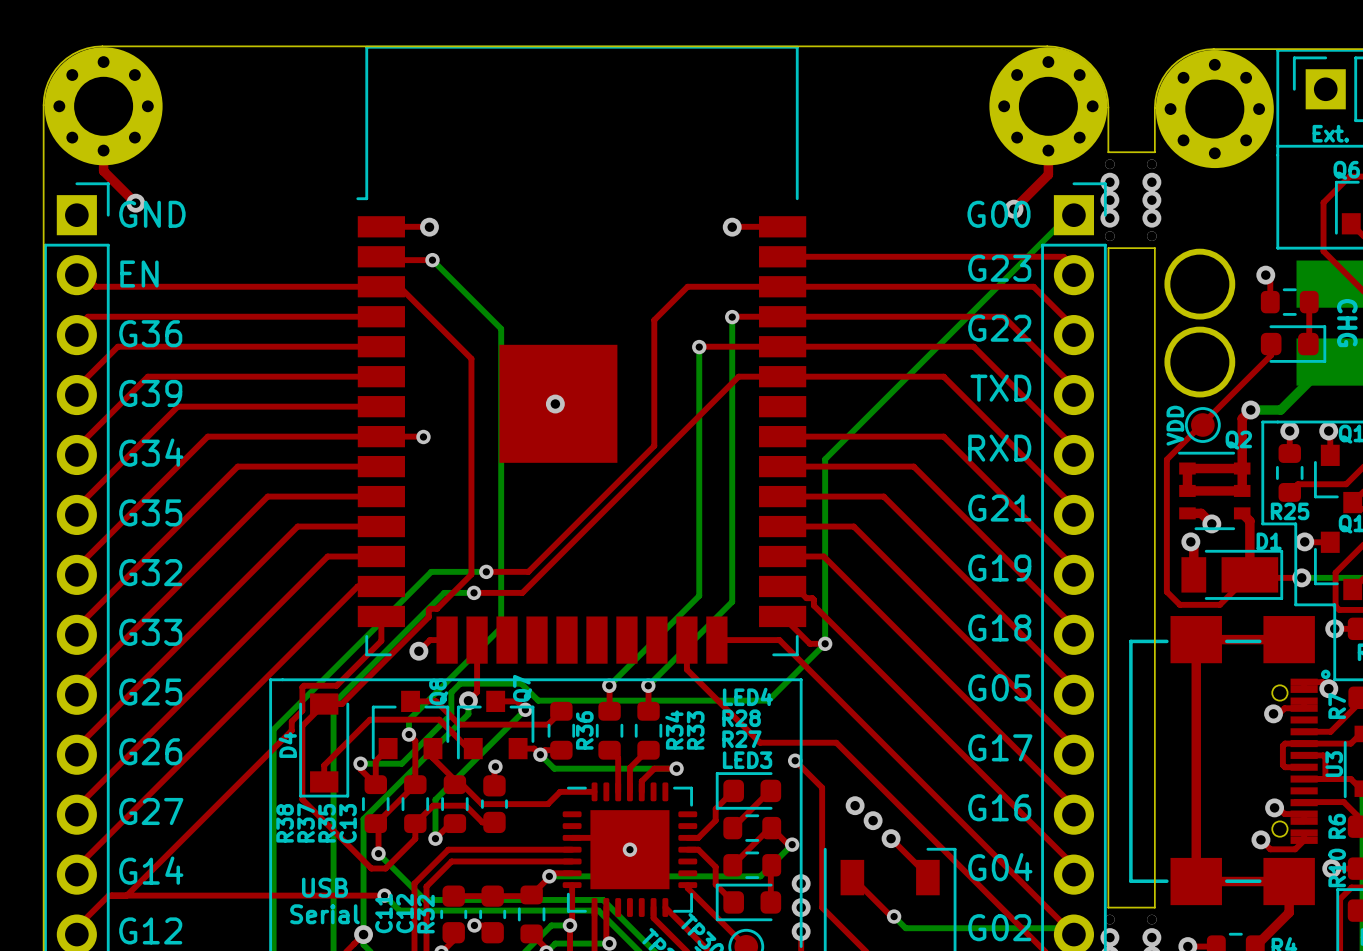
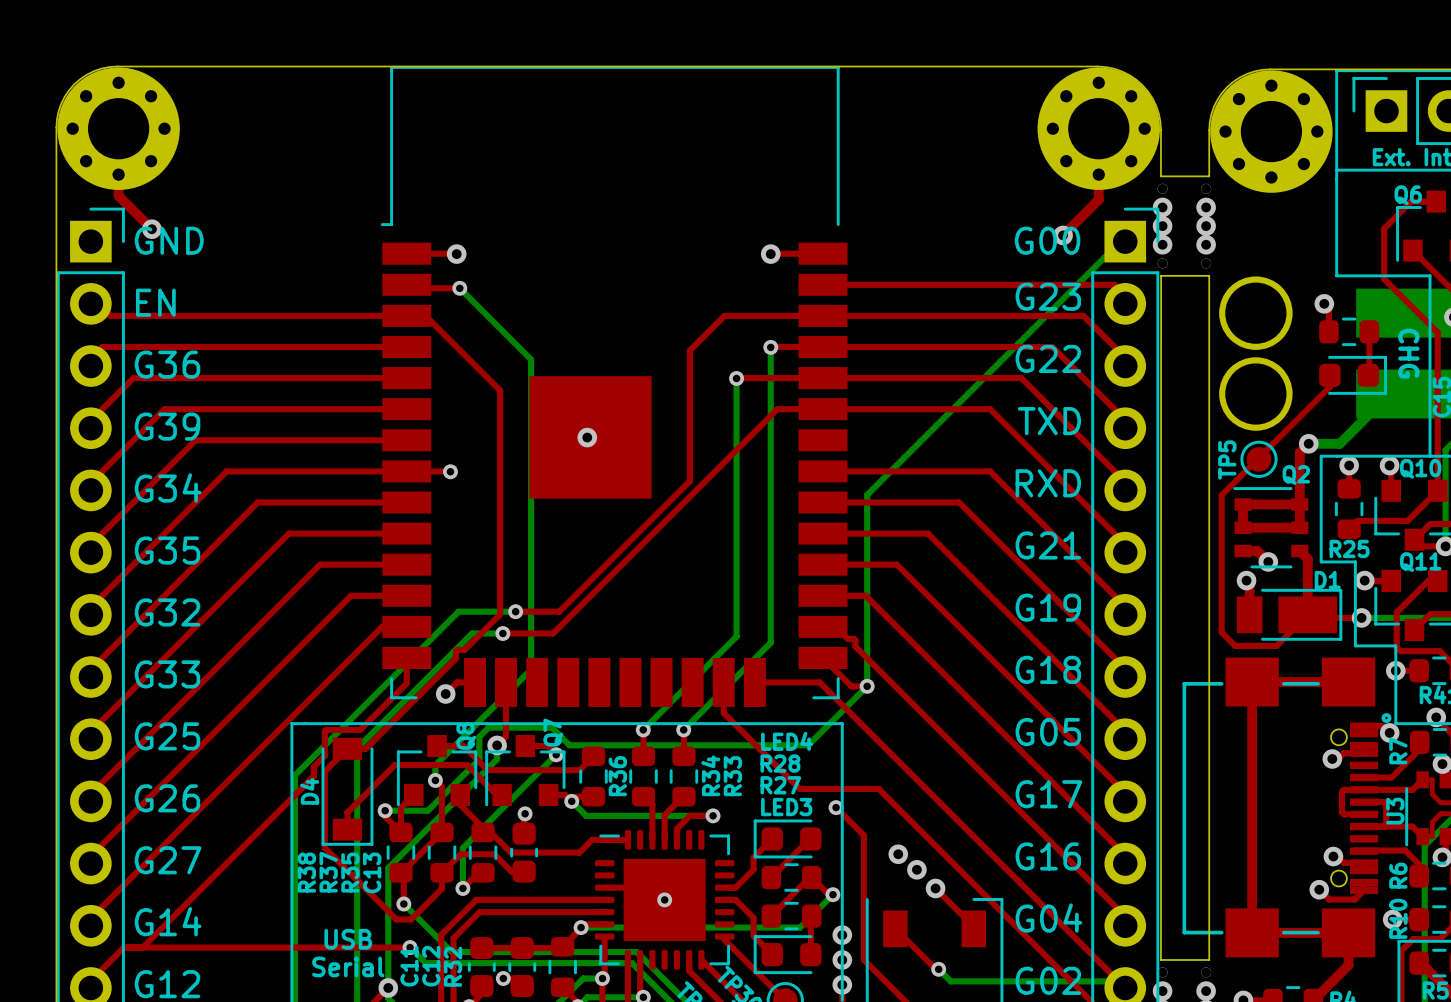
TP5 name: none -> TP5 (1227, 460)
text: VDD (1175, 425) -> none

